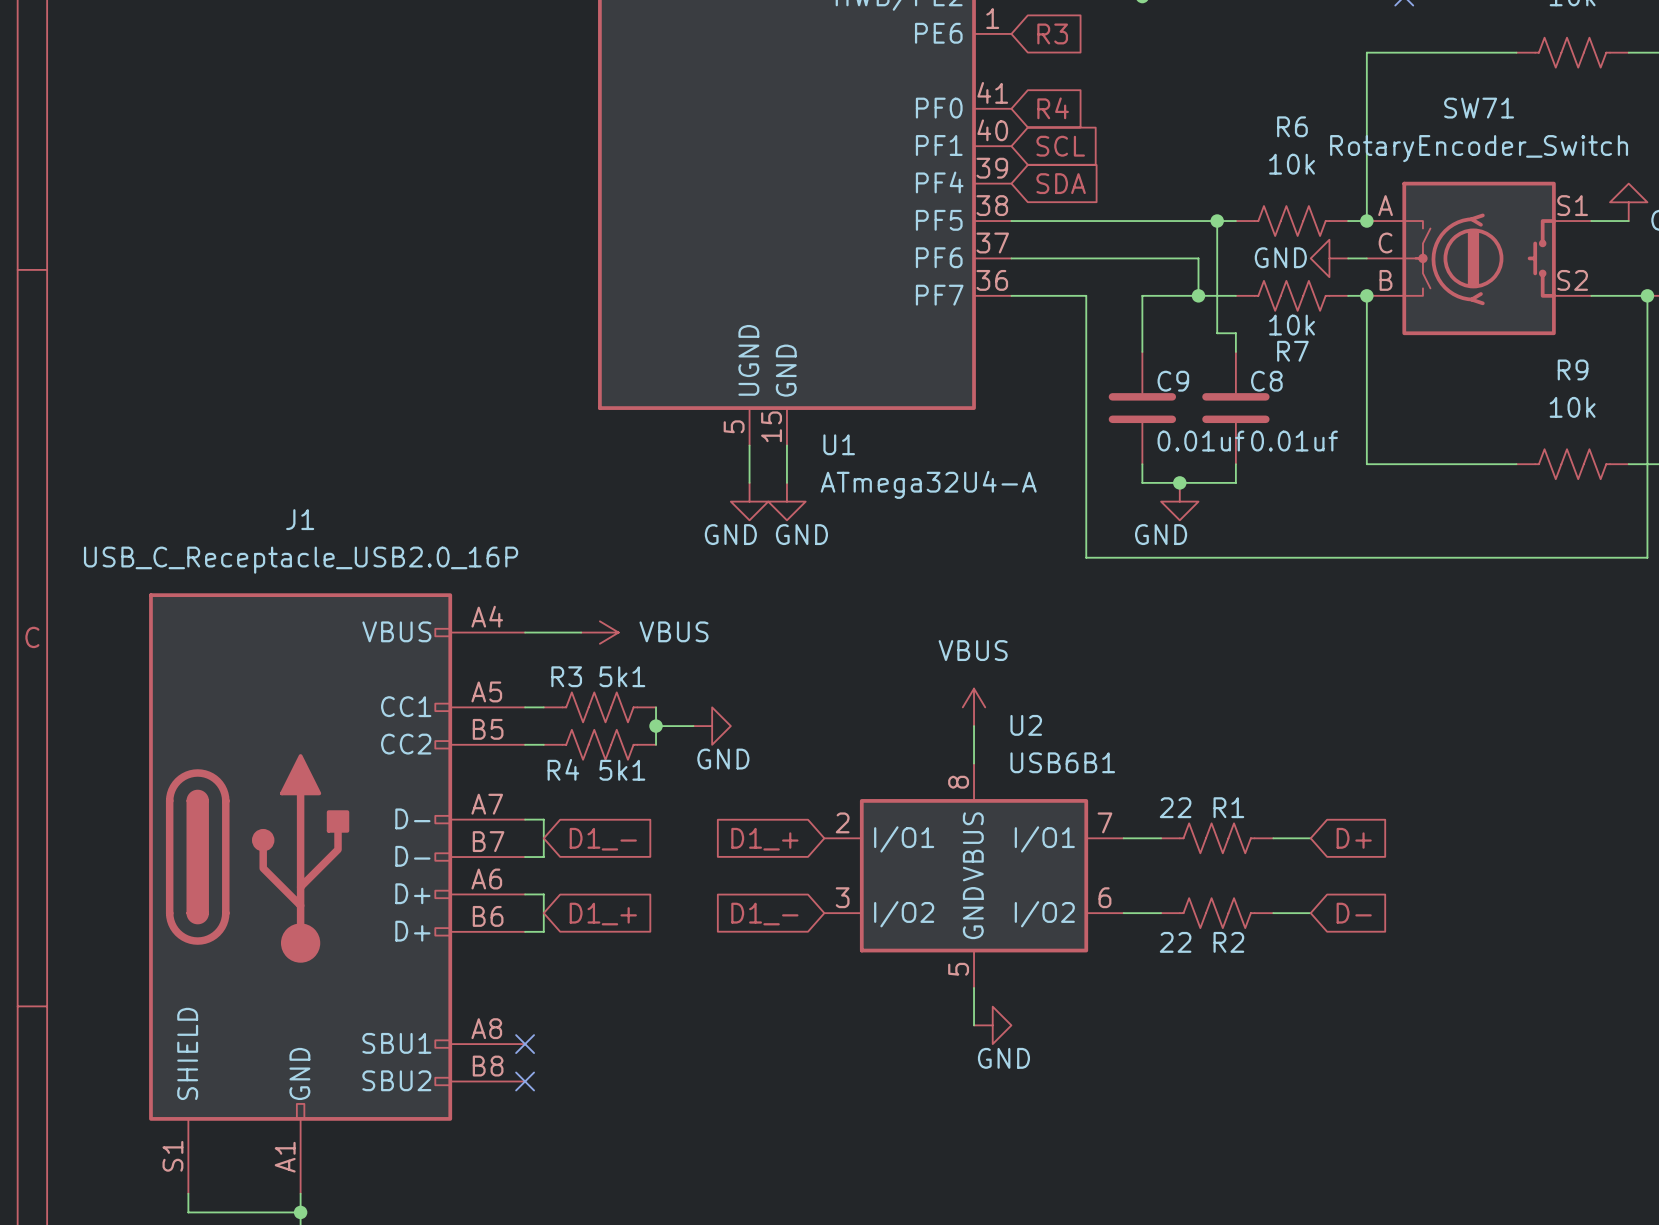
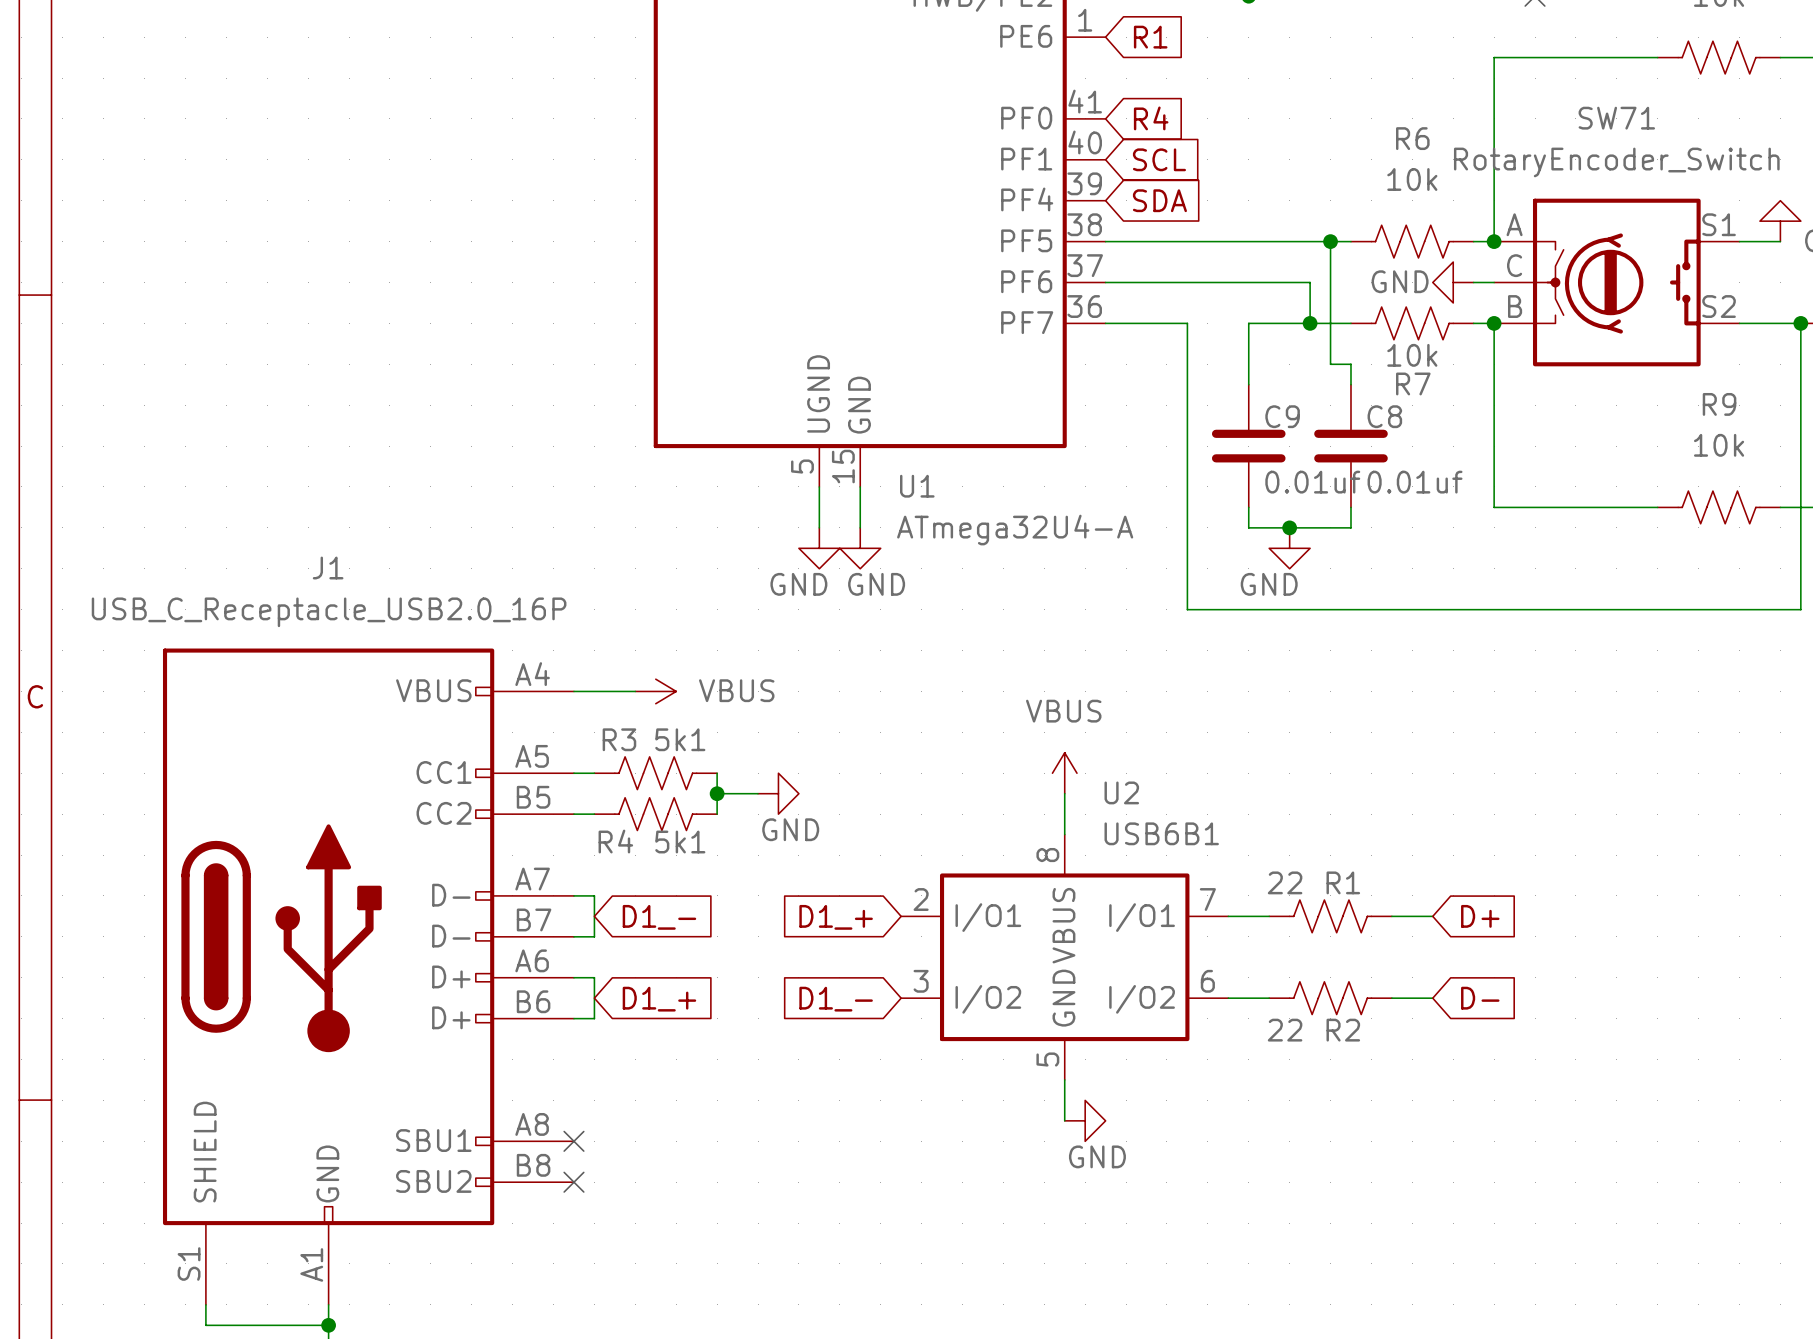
global label: R3 (1052, 33) -> R1 (1150, 37)

